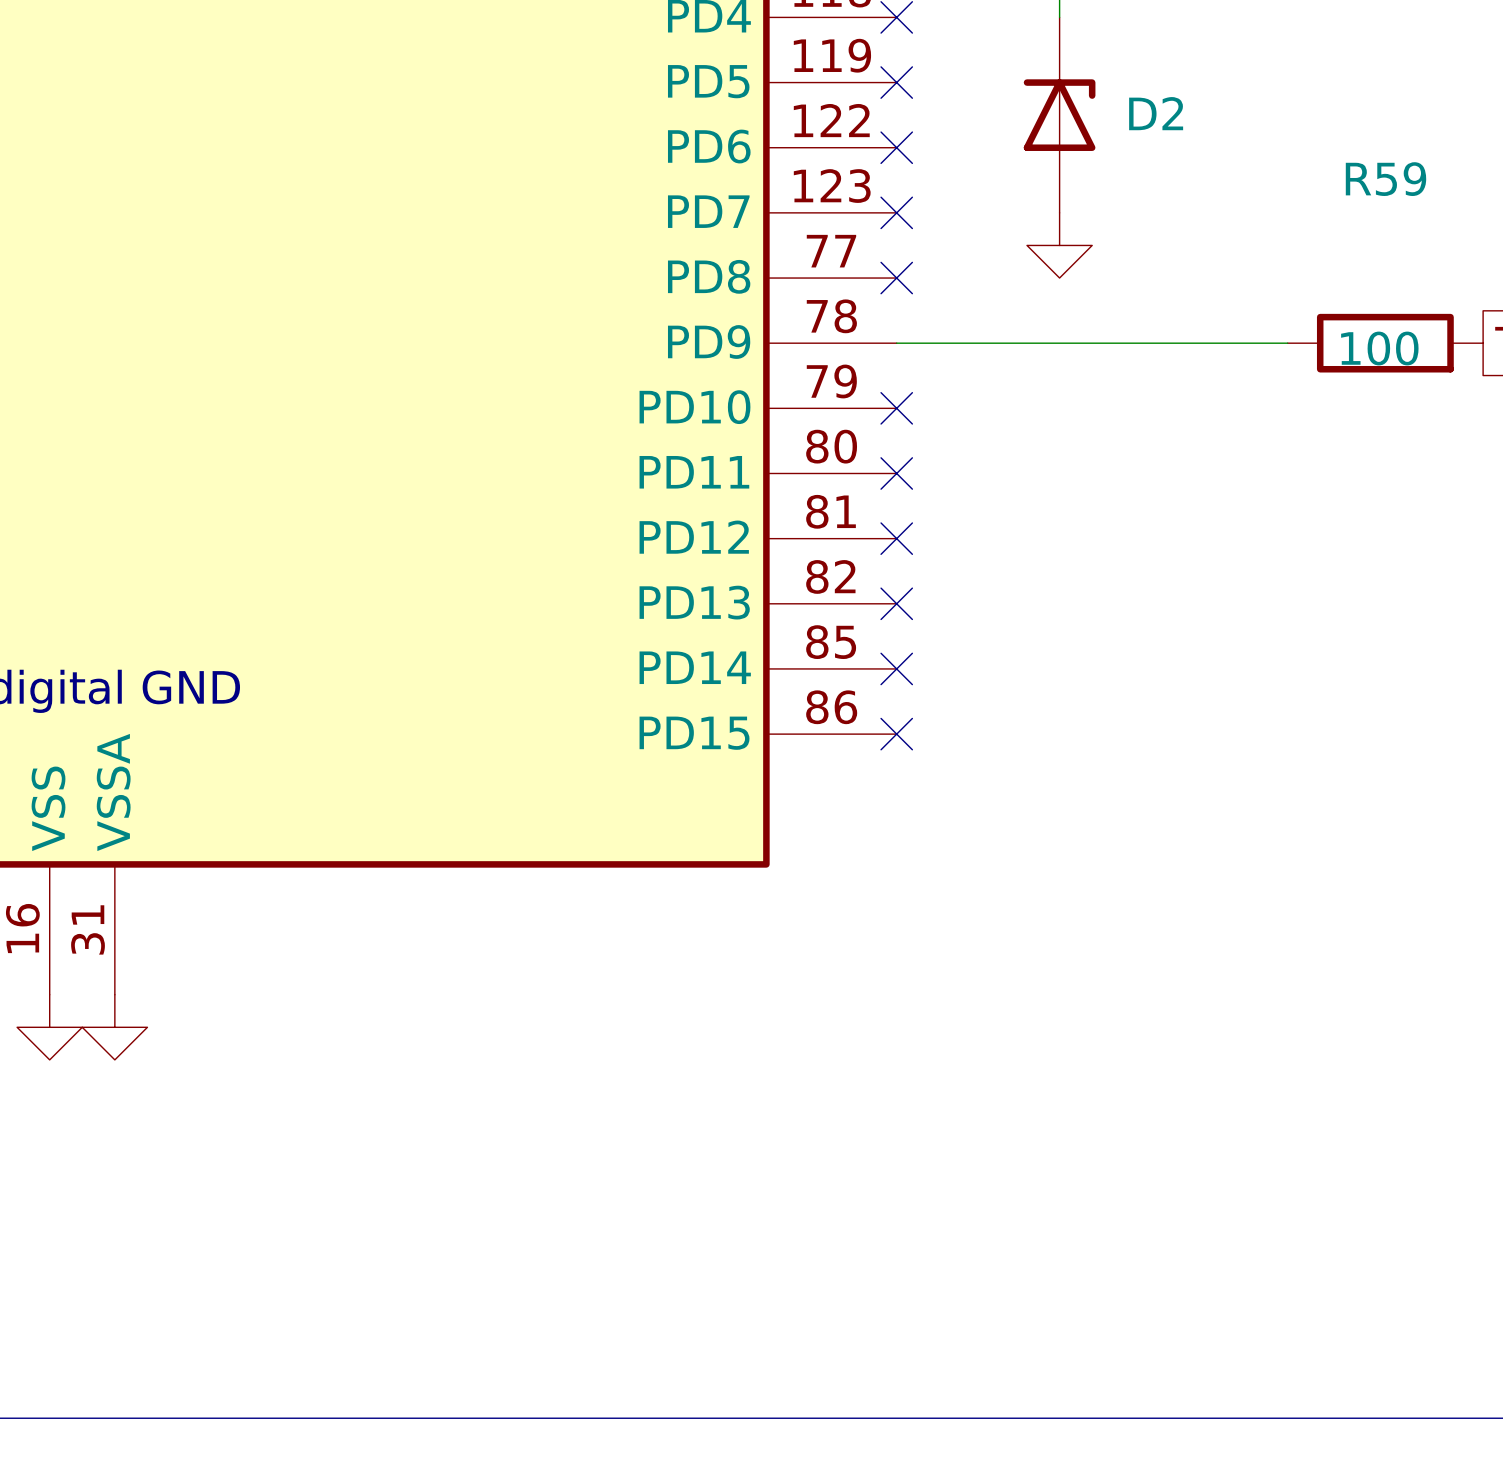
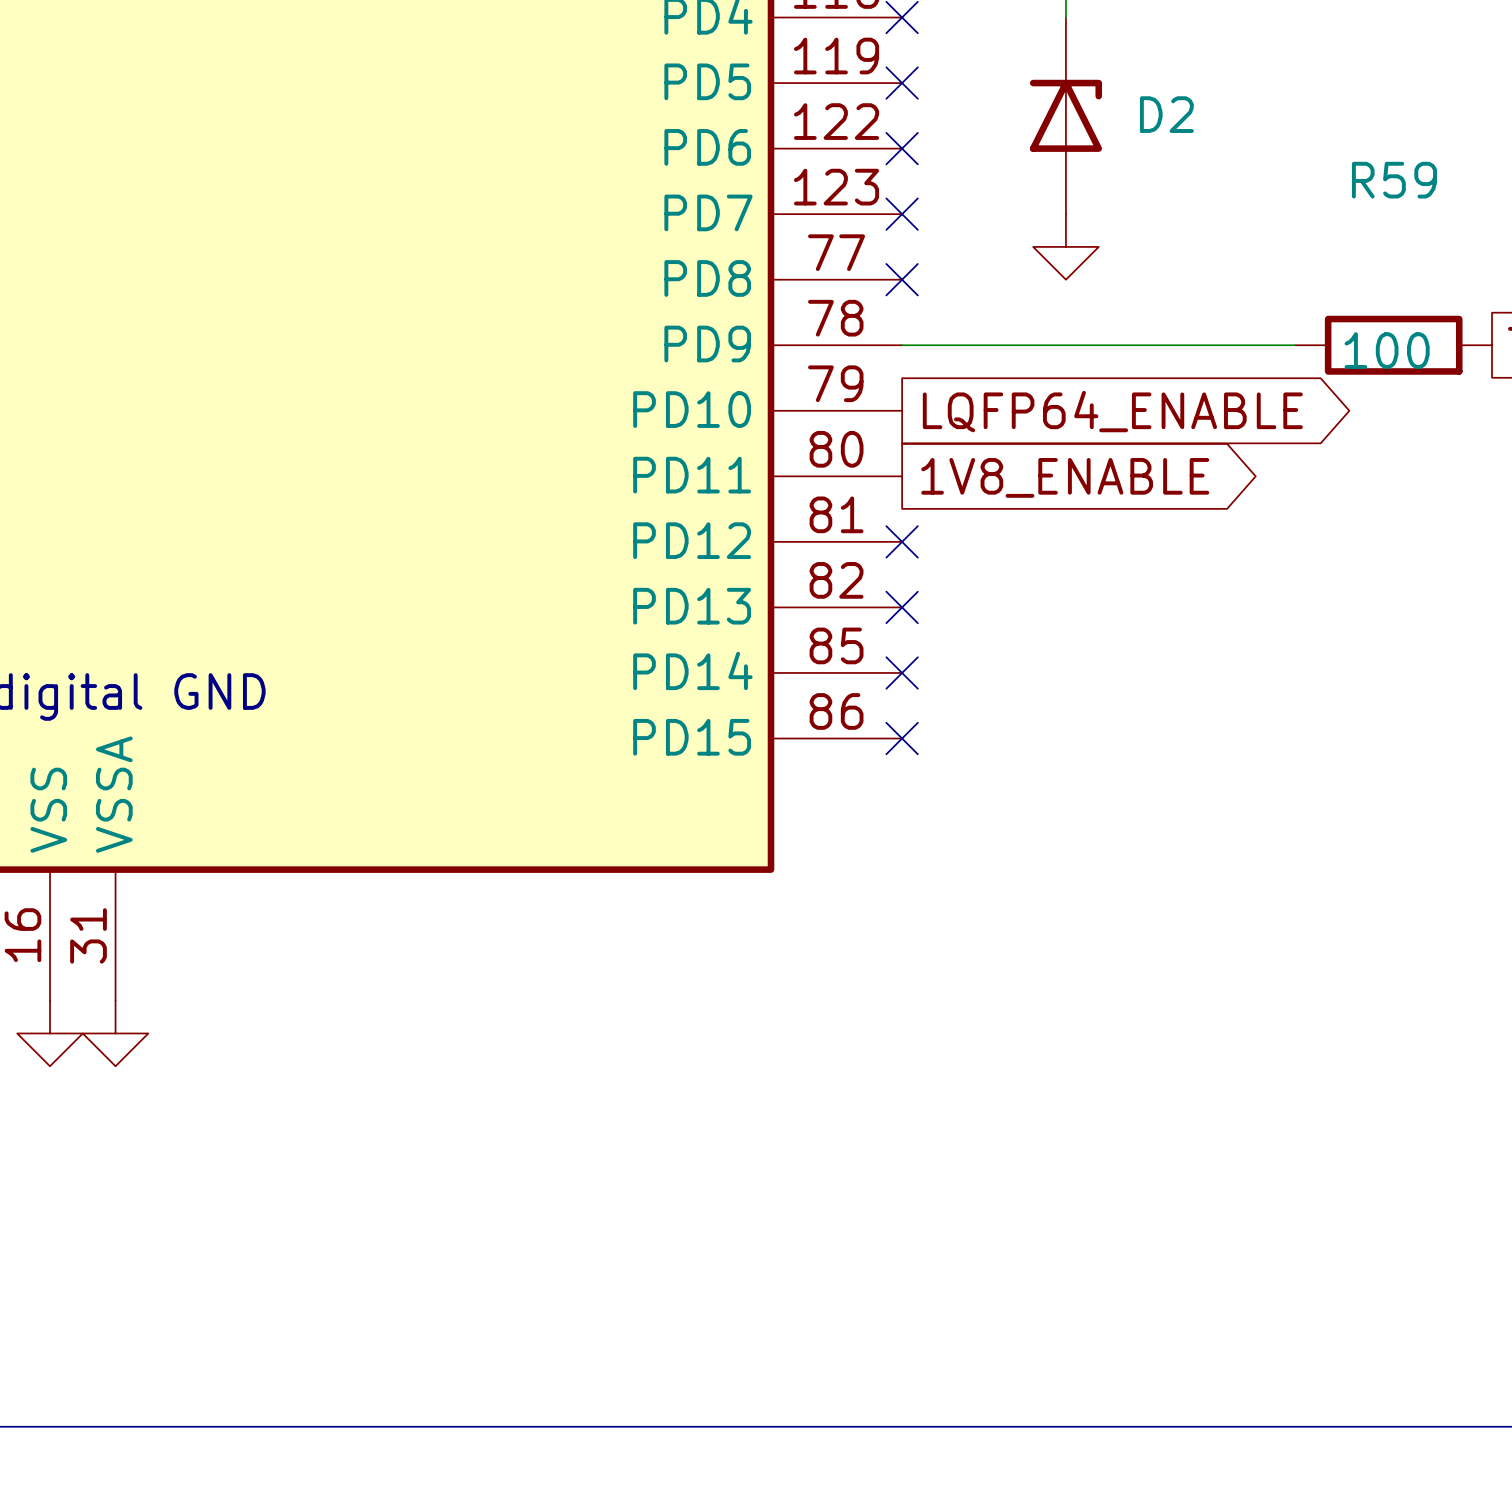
no-connect mark: (896, 408) -> none
global label: none -> LQFP64_ENABLE (1112, 411)
no-connect mark: (896, 473) -> none
global label: none -> 1V8_ENABLE (1065, 477)

